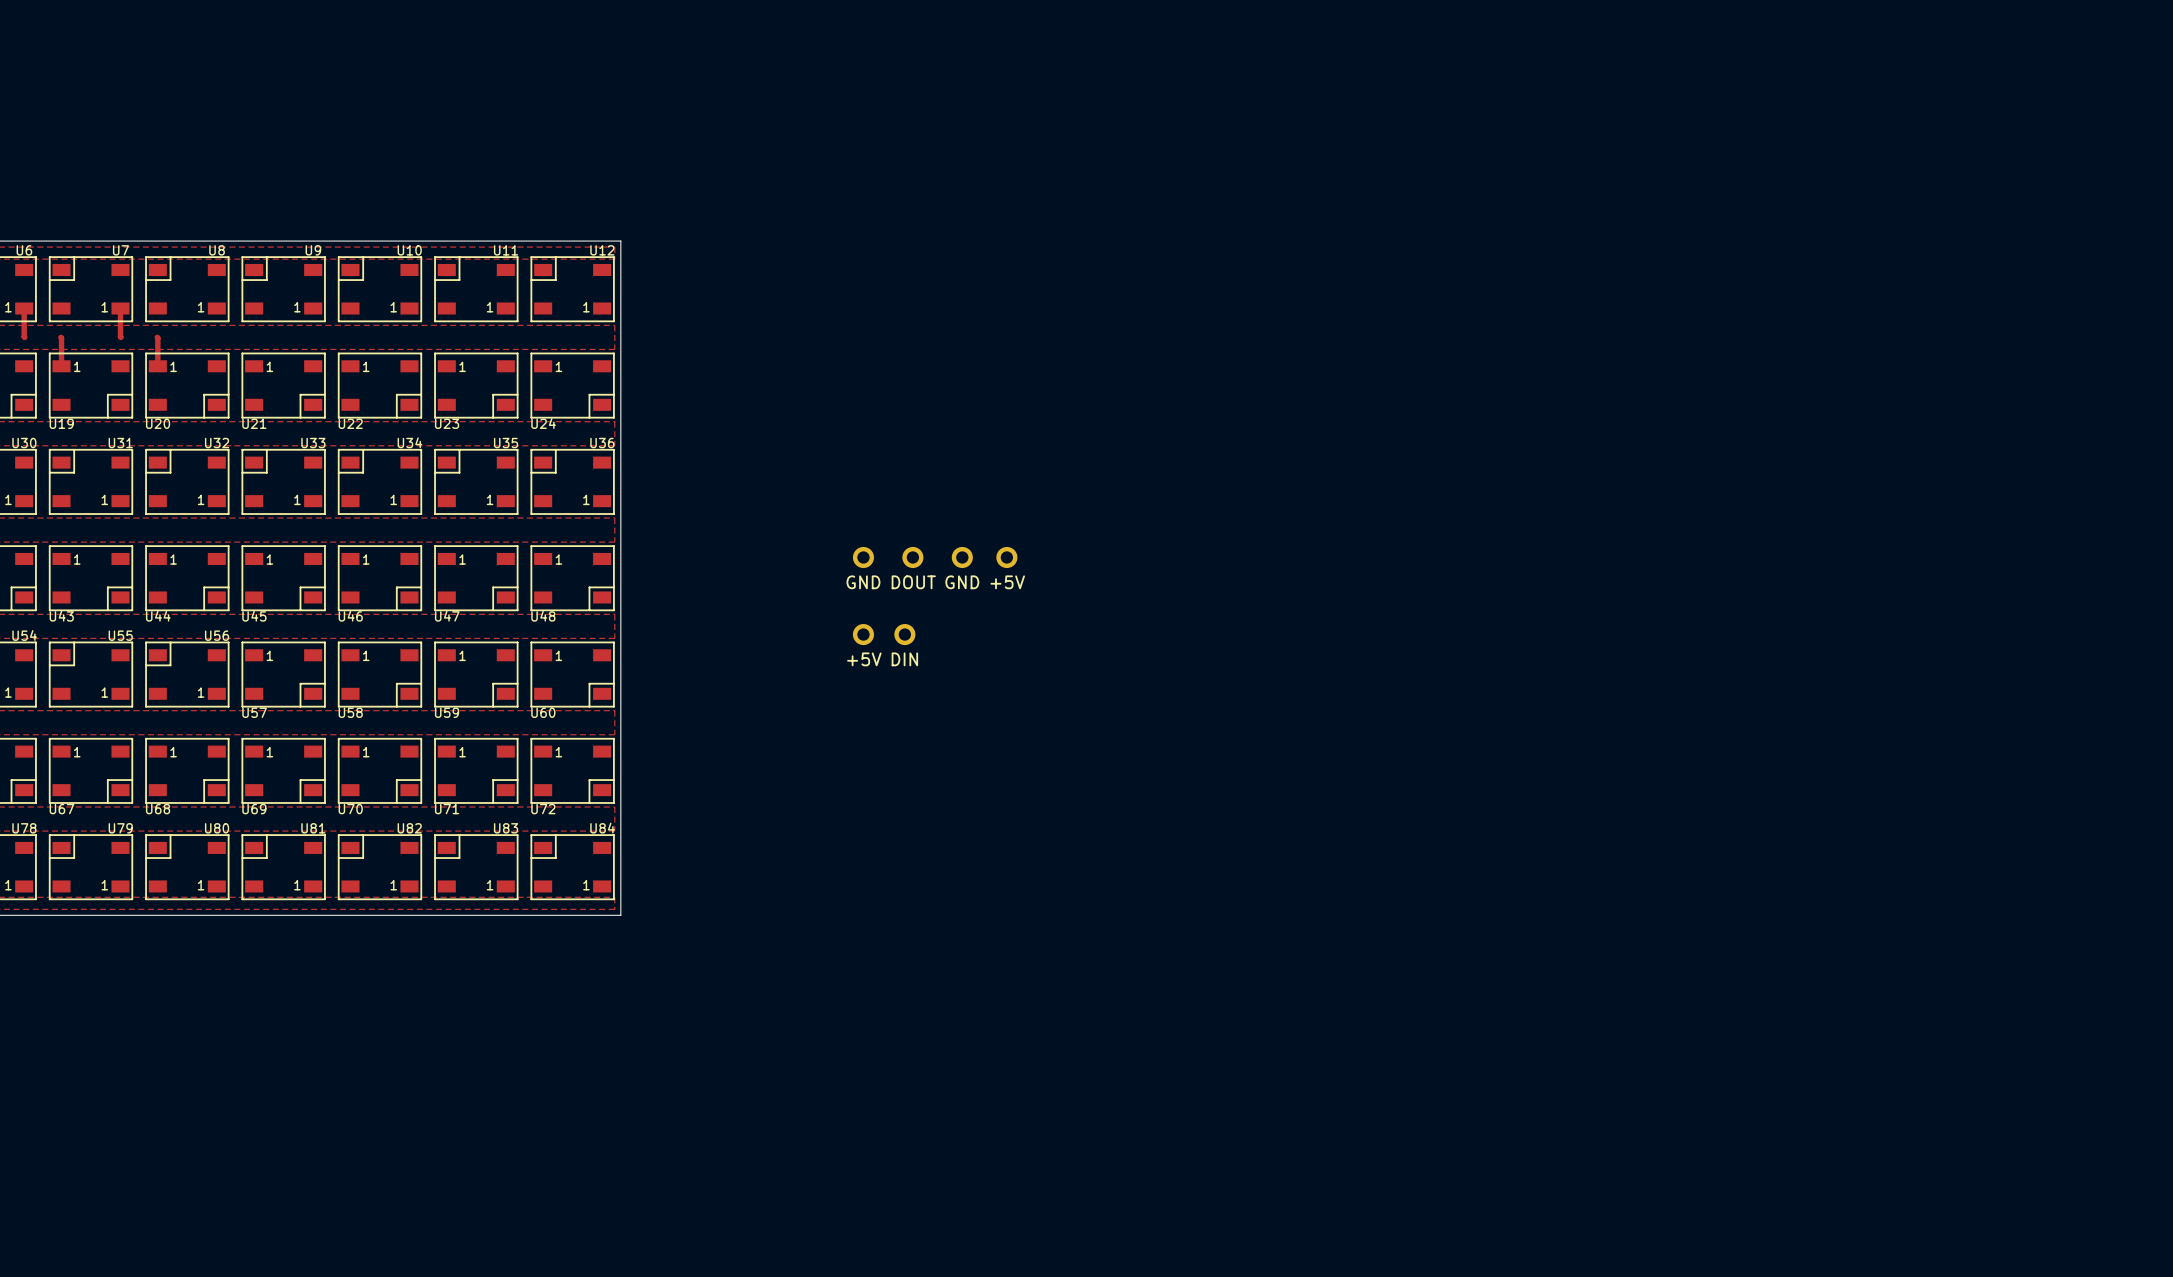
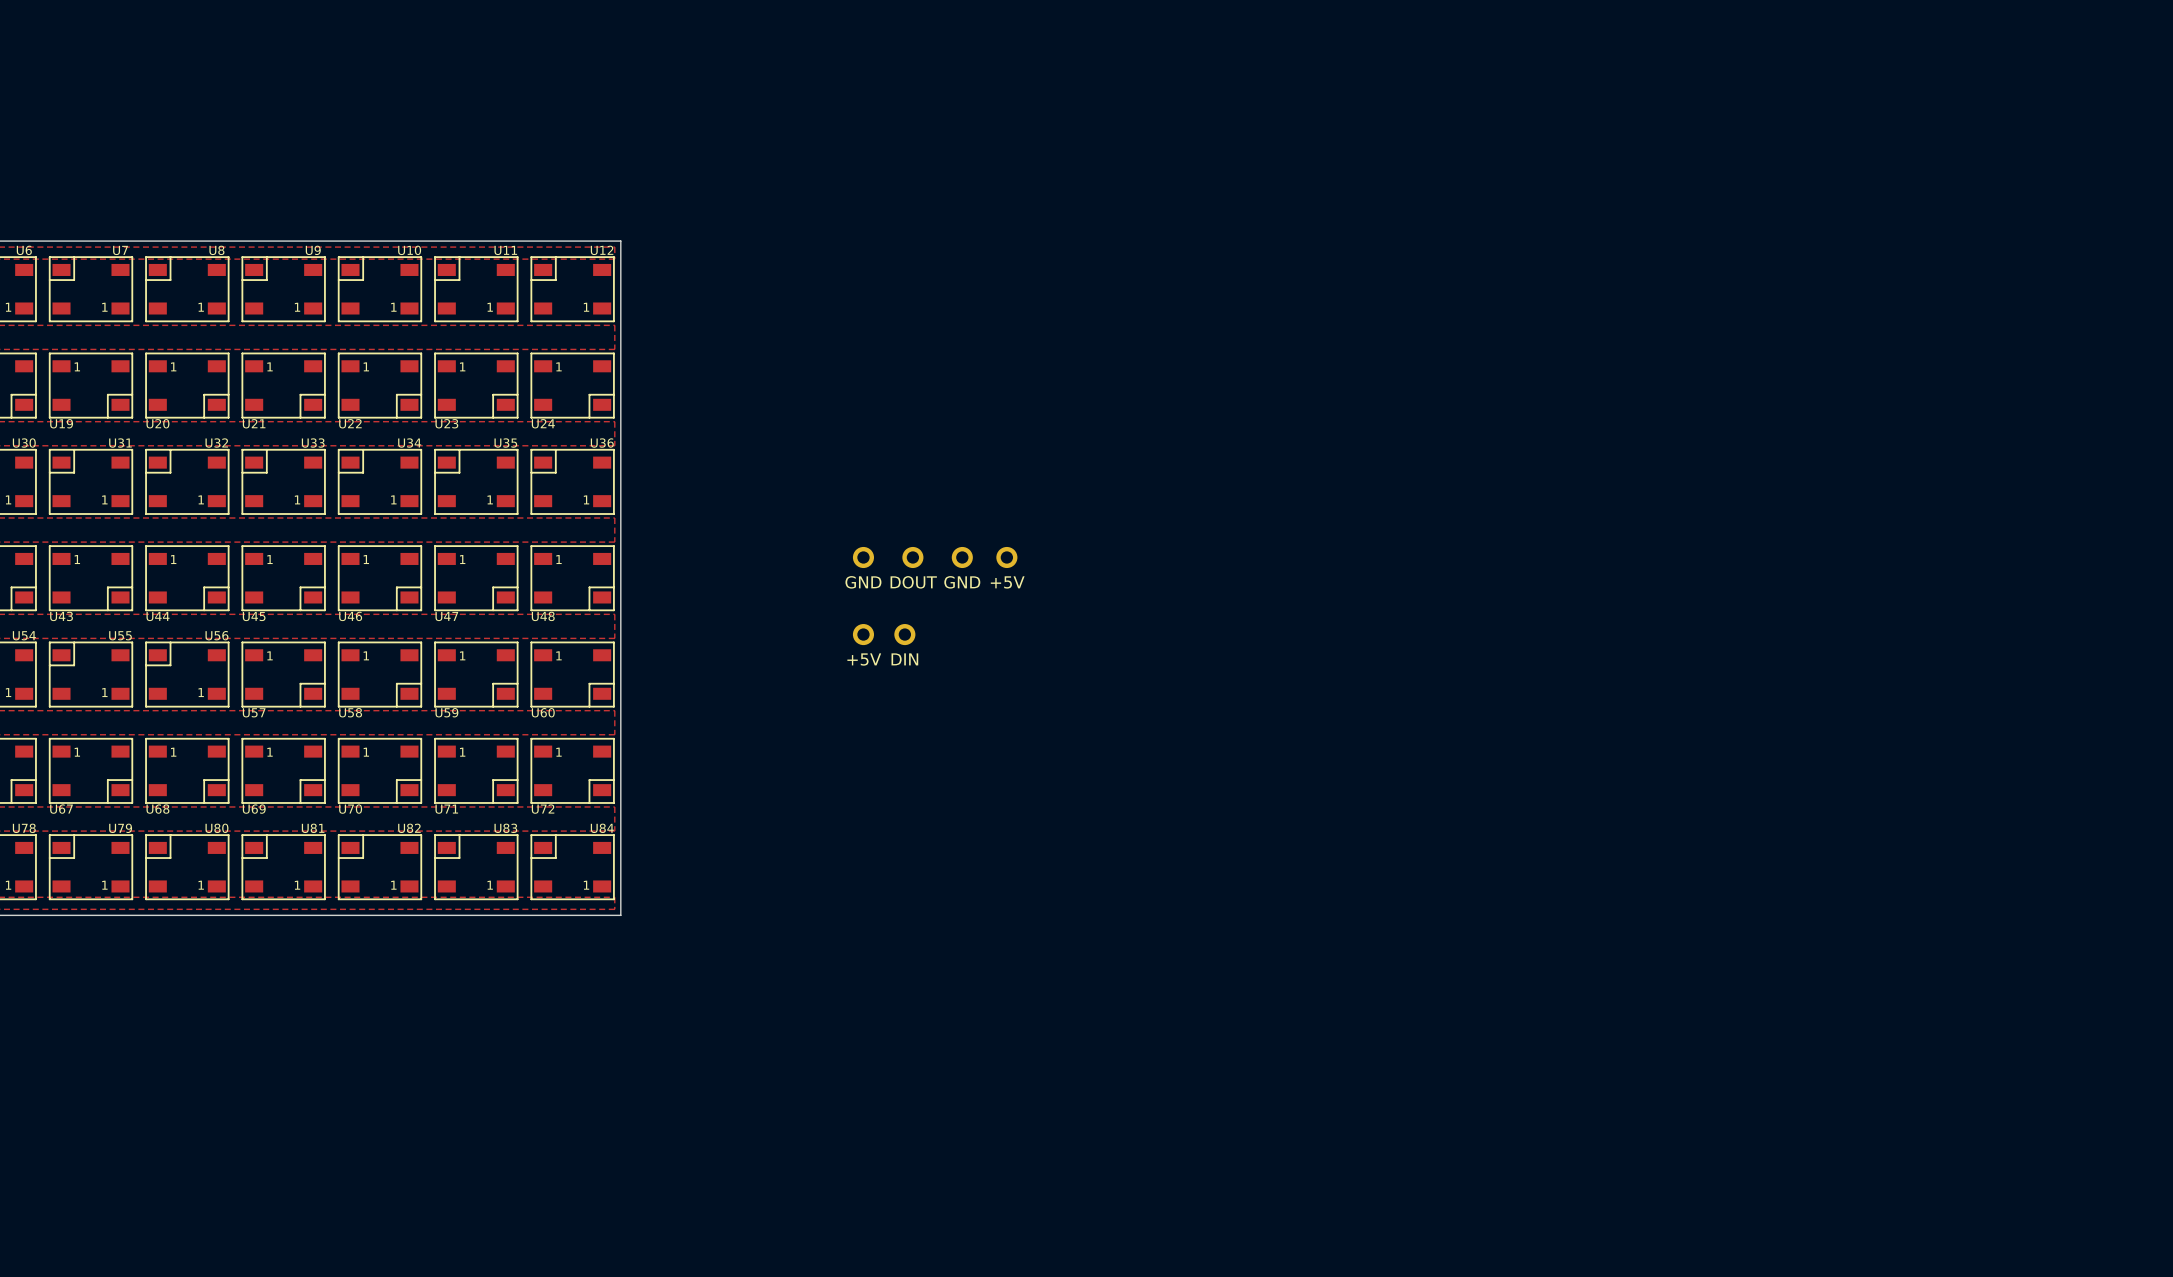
top track: (24, 308) (24, 337) -> none
top track: (120, 308) (121, 337) -> none
top track: (60, 337) (61, 366) -> none
top track: (157, 337) (157, 366) -> none

